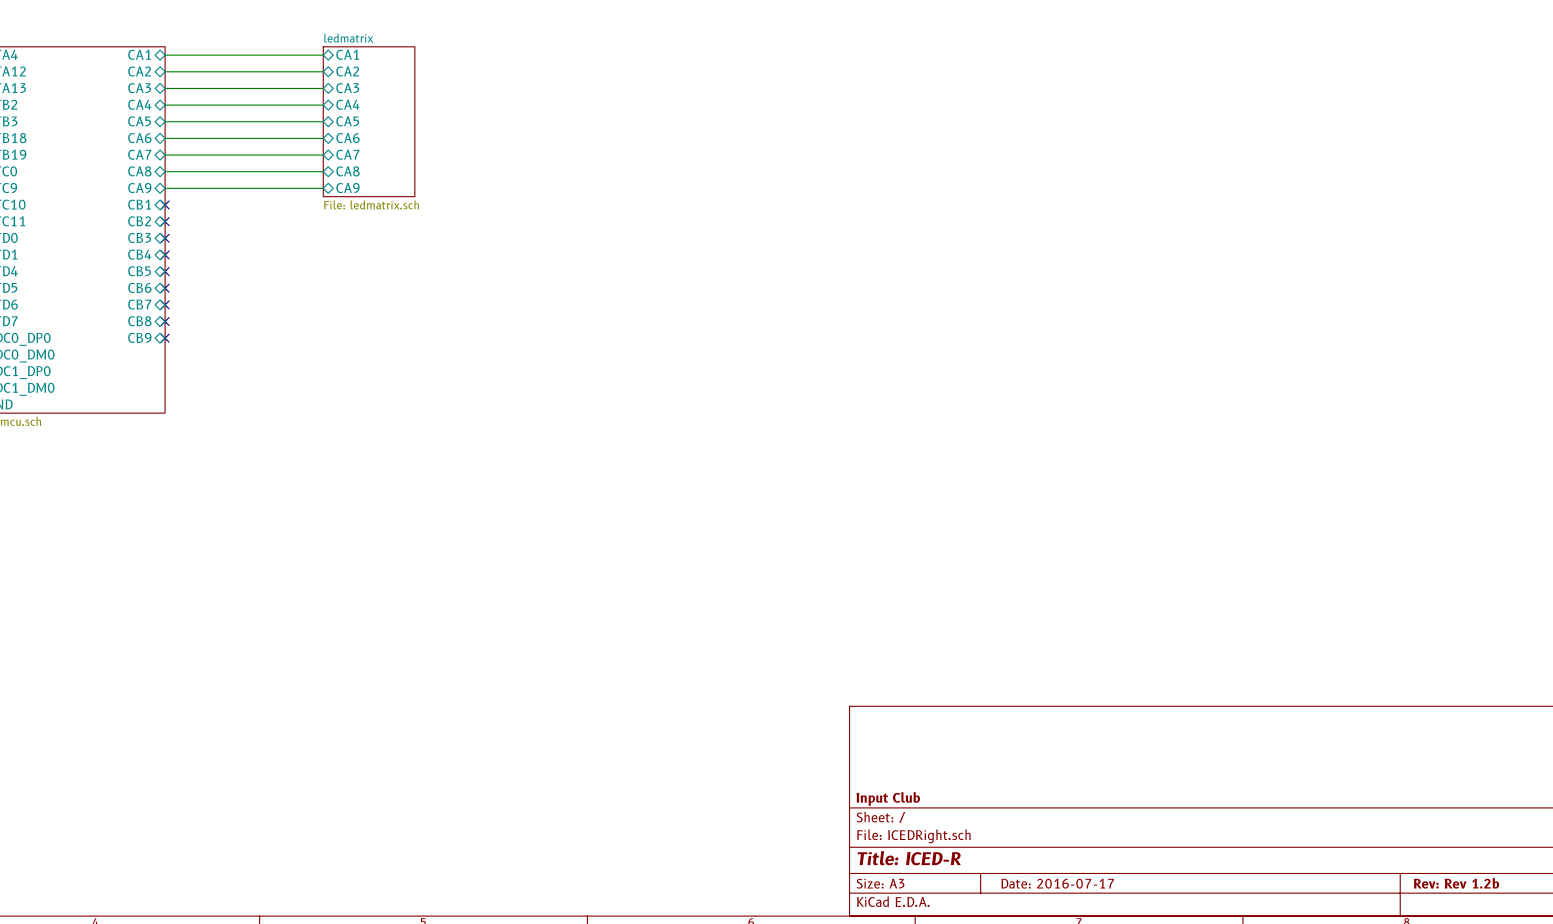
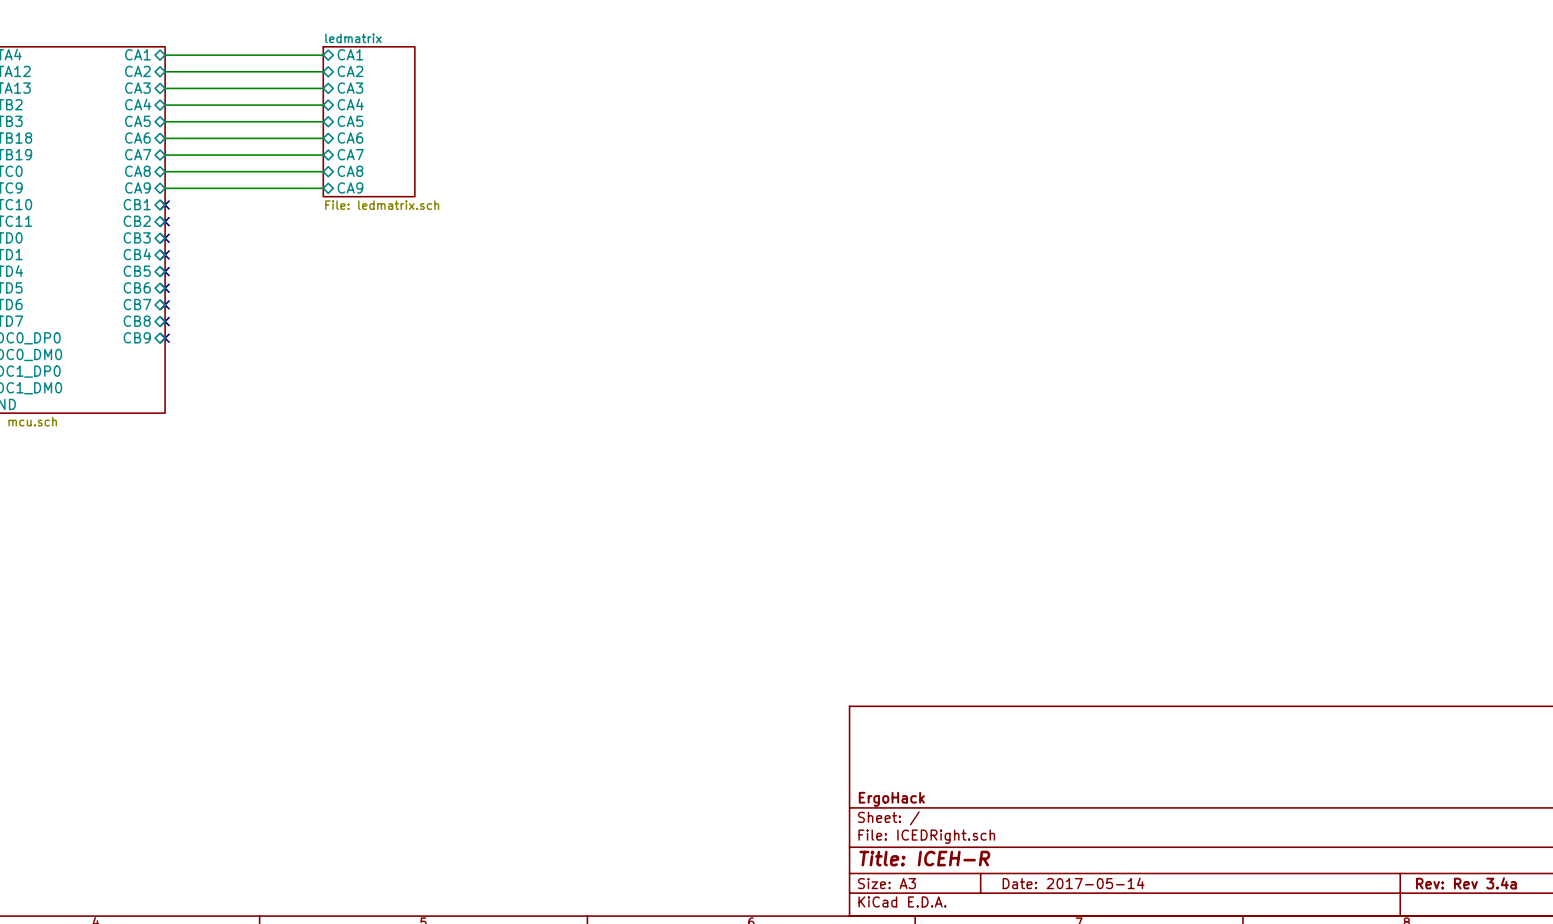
title block: Input Club (888, 798) -> ErgoHack (891, 799)
title block: Title: ICED-R (909, 858) -> Title: ICEH-R (924, 858)
title block: Date: 2016-07-17 (1057, 883) -> Date: 2017-05-14 (1073, 883)
title block: Rev: Rev 1.2b (1456, 883) -> Rev: Rev 3.4a (1466, 883)

